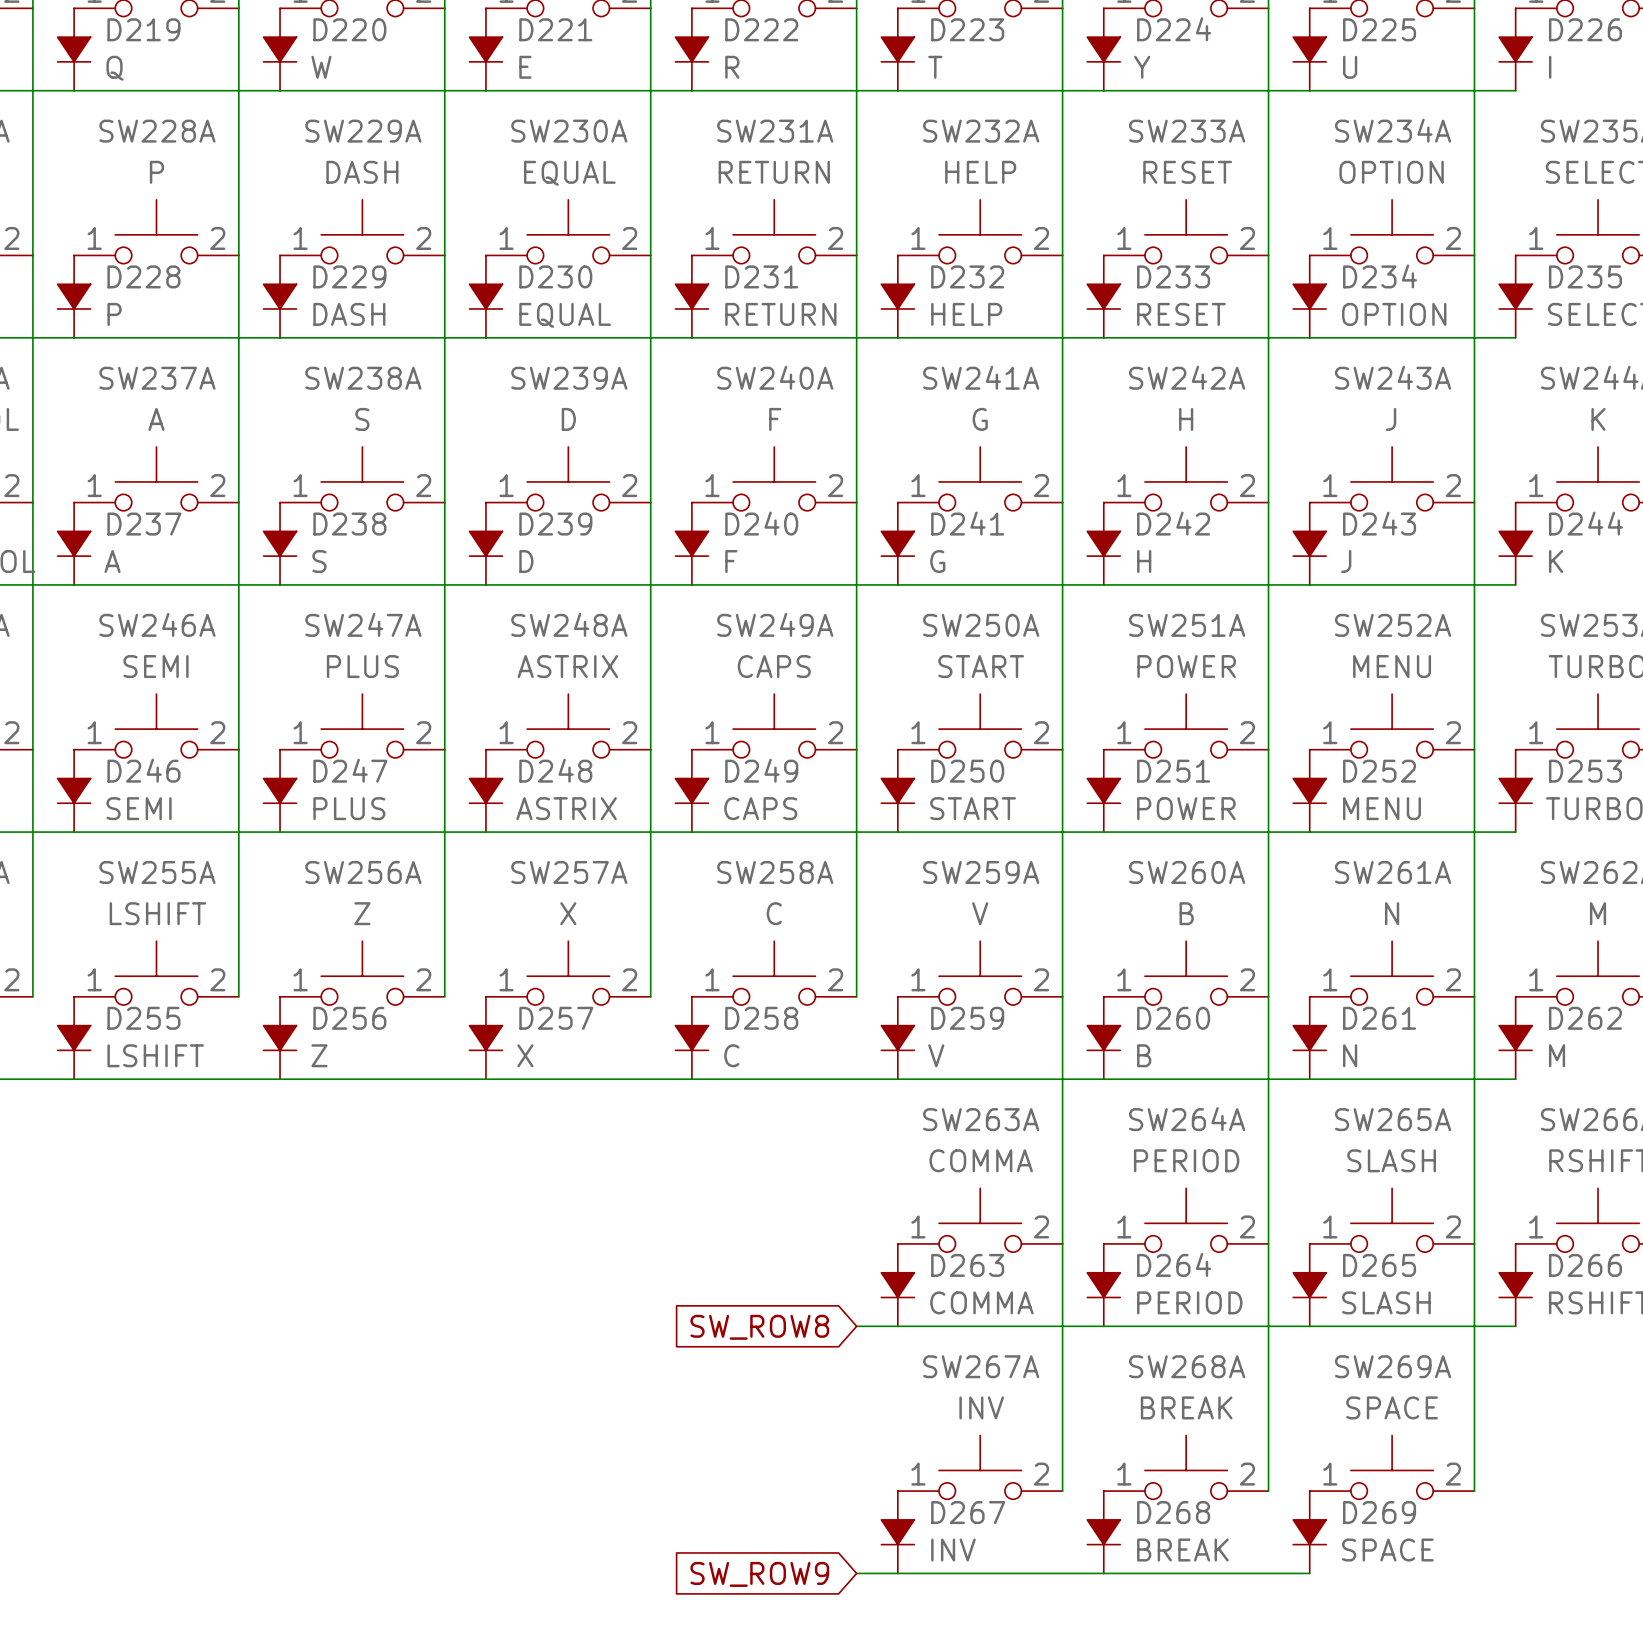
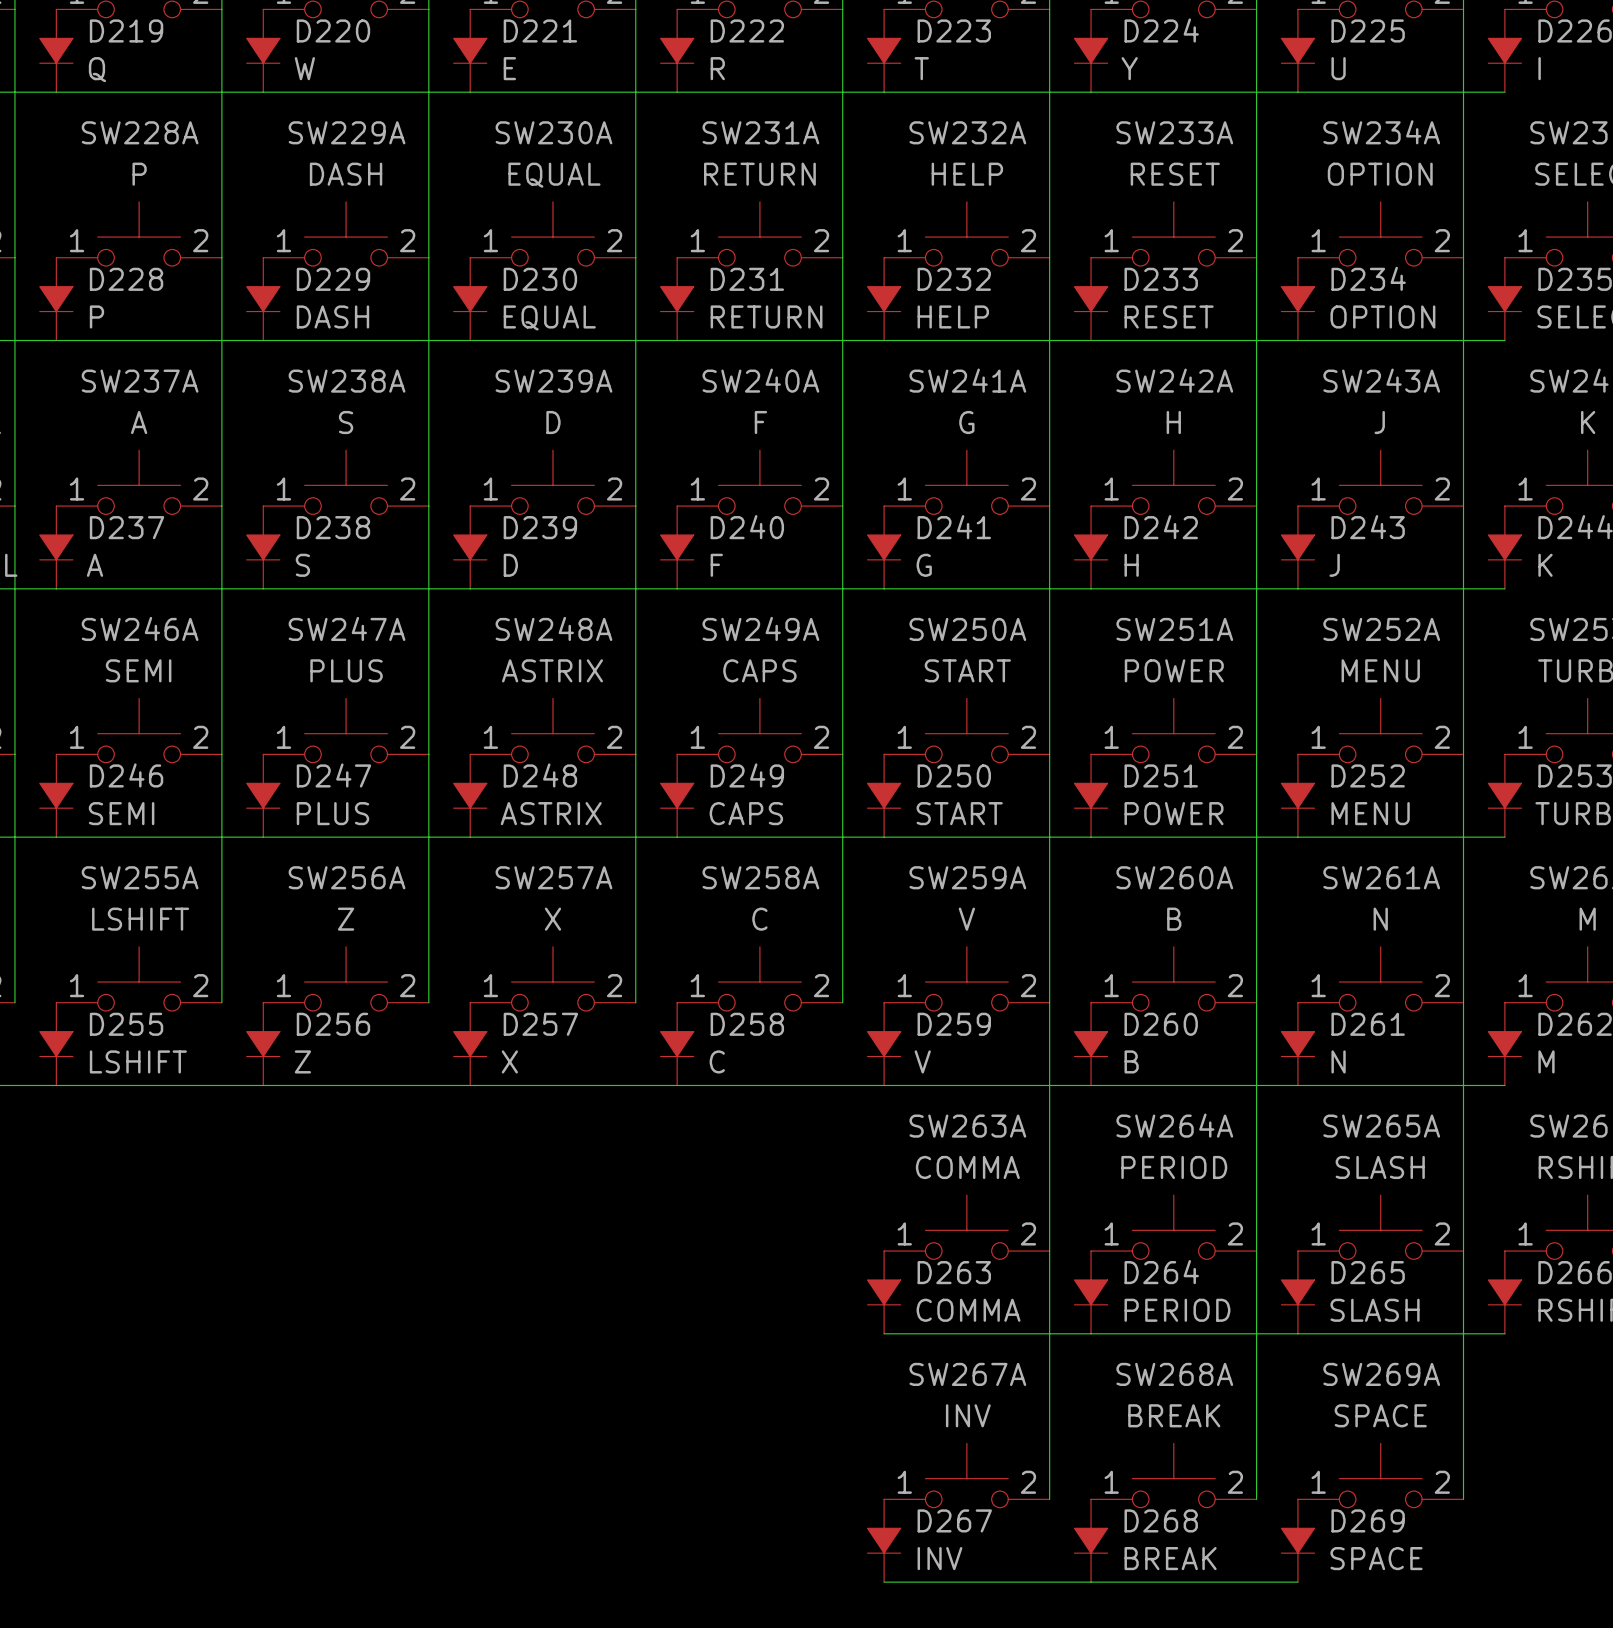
wire: (856, 1326) (897, 1326) -> none
global label: SW_ROW8 (759, 1327) -> none
wire: (856, 1573) (897, 1573) -> none
global label: SW_ROW9 (759, 1574) -> none

